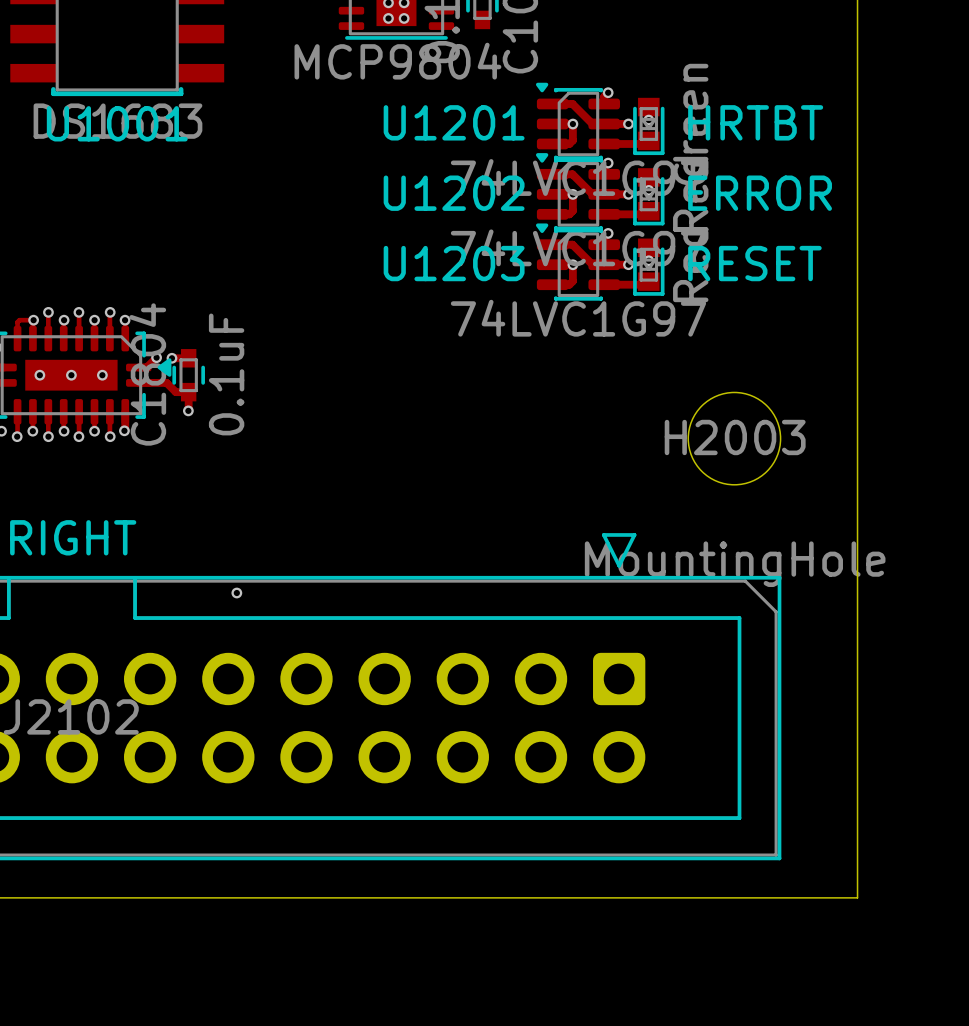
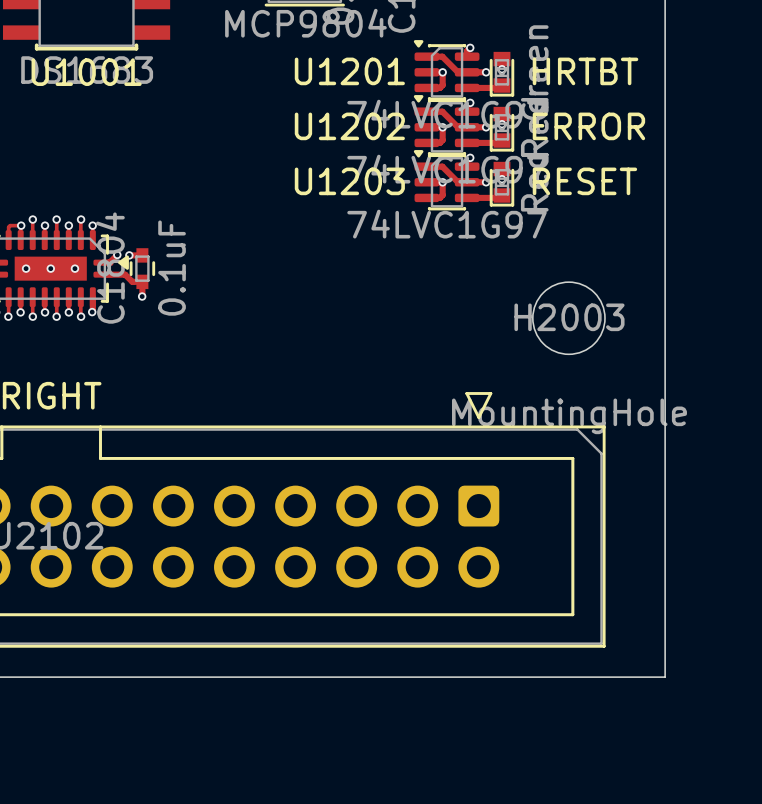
via: (236, 593) -> none

